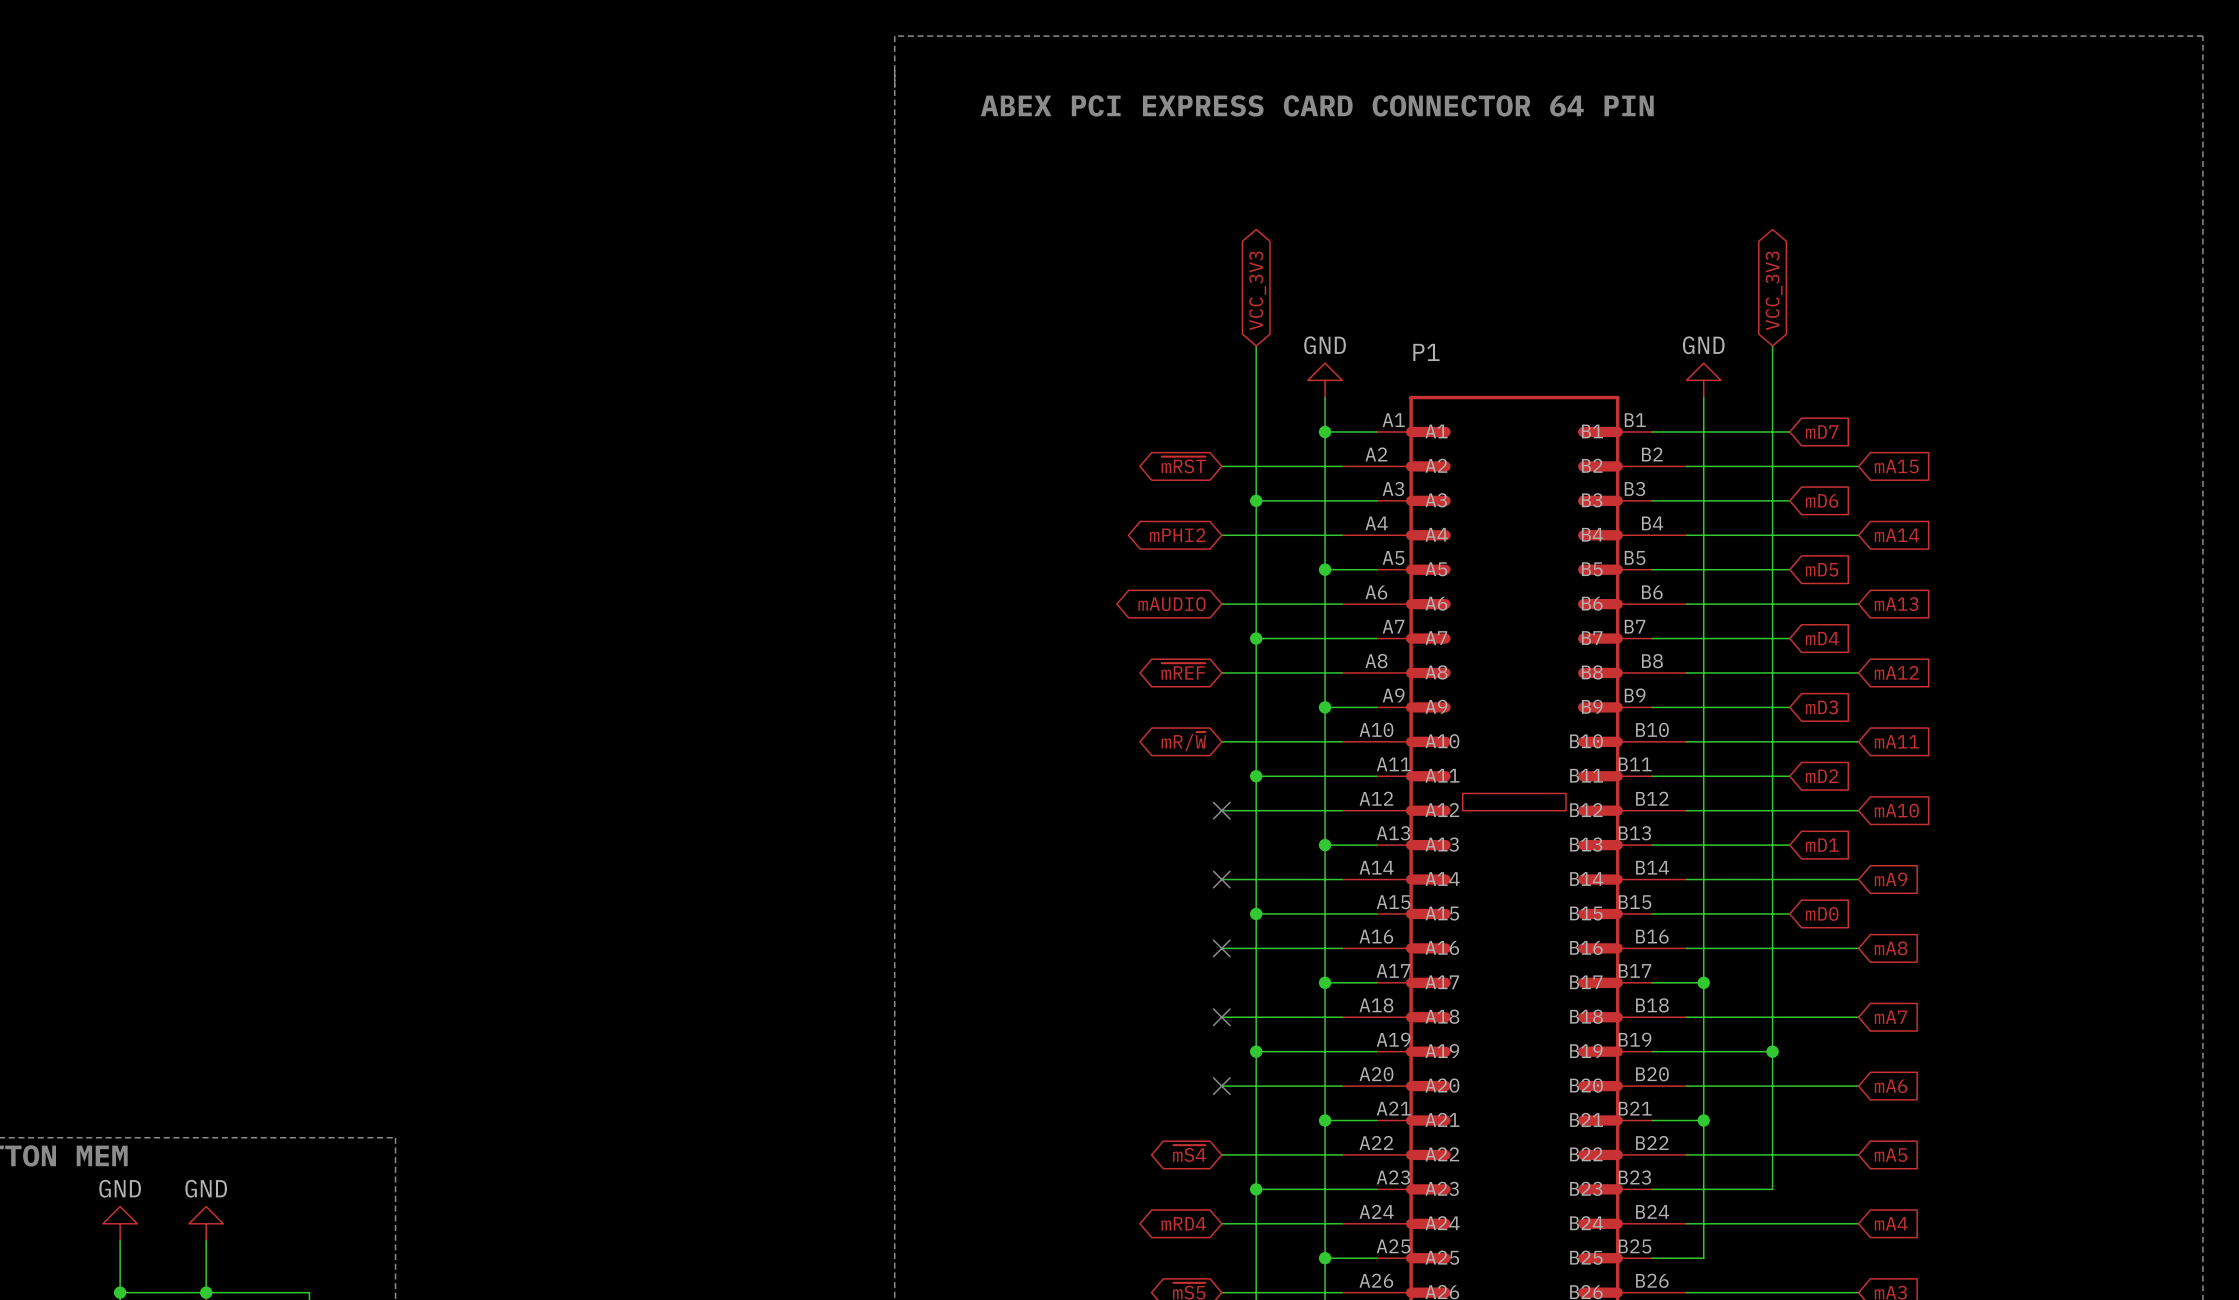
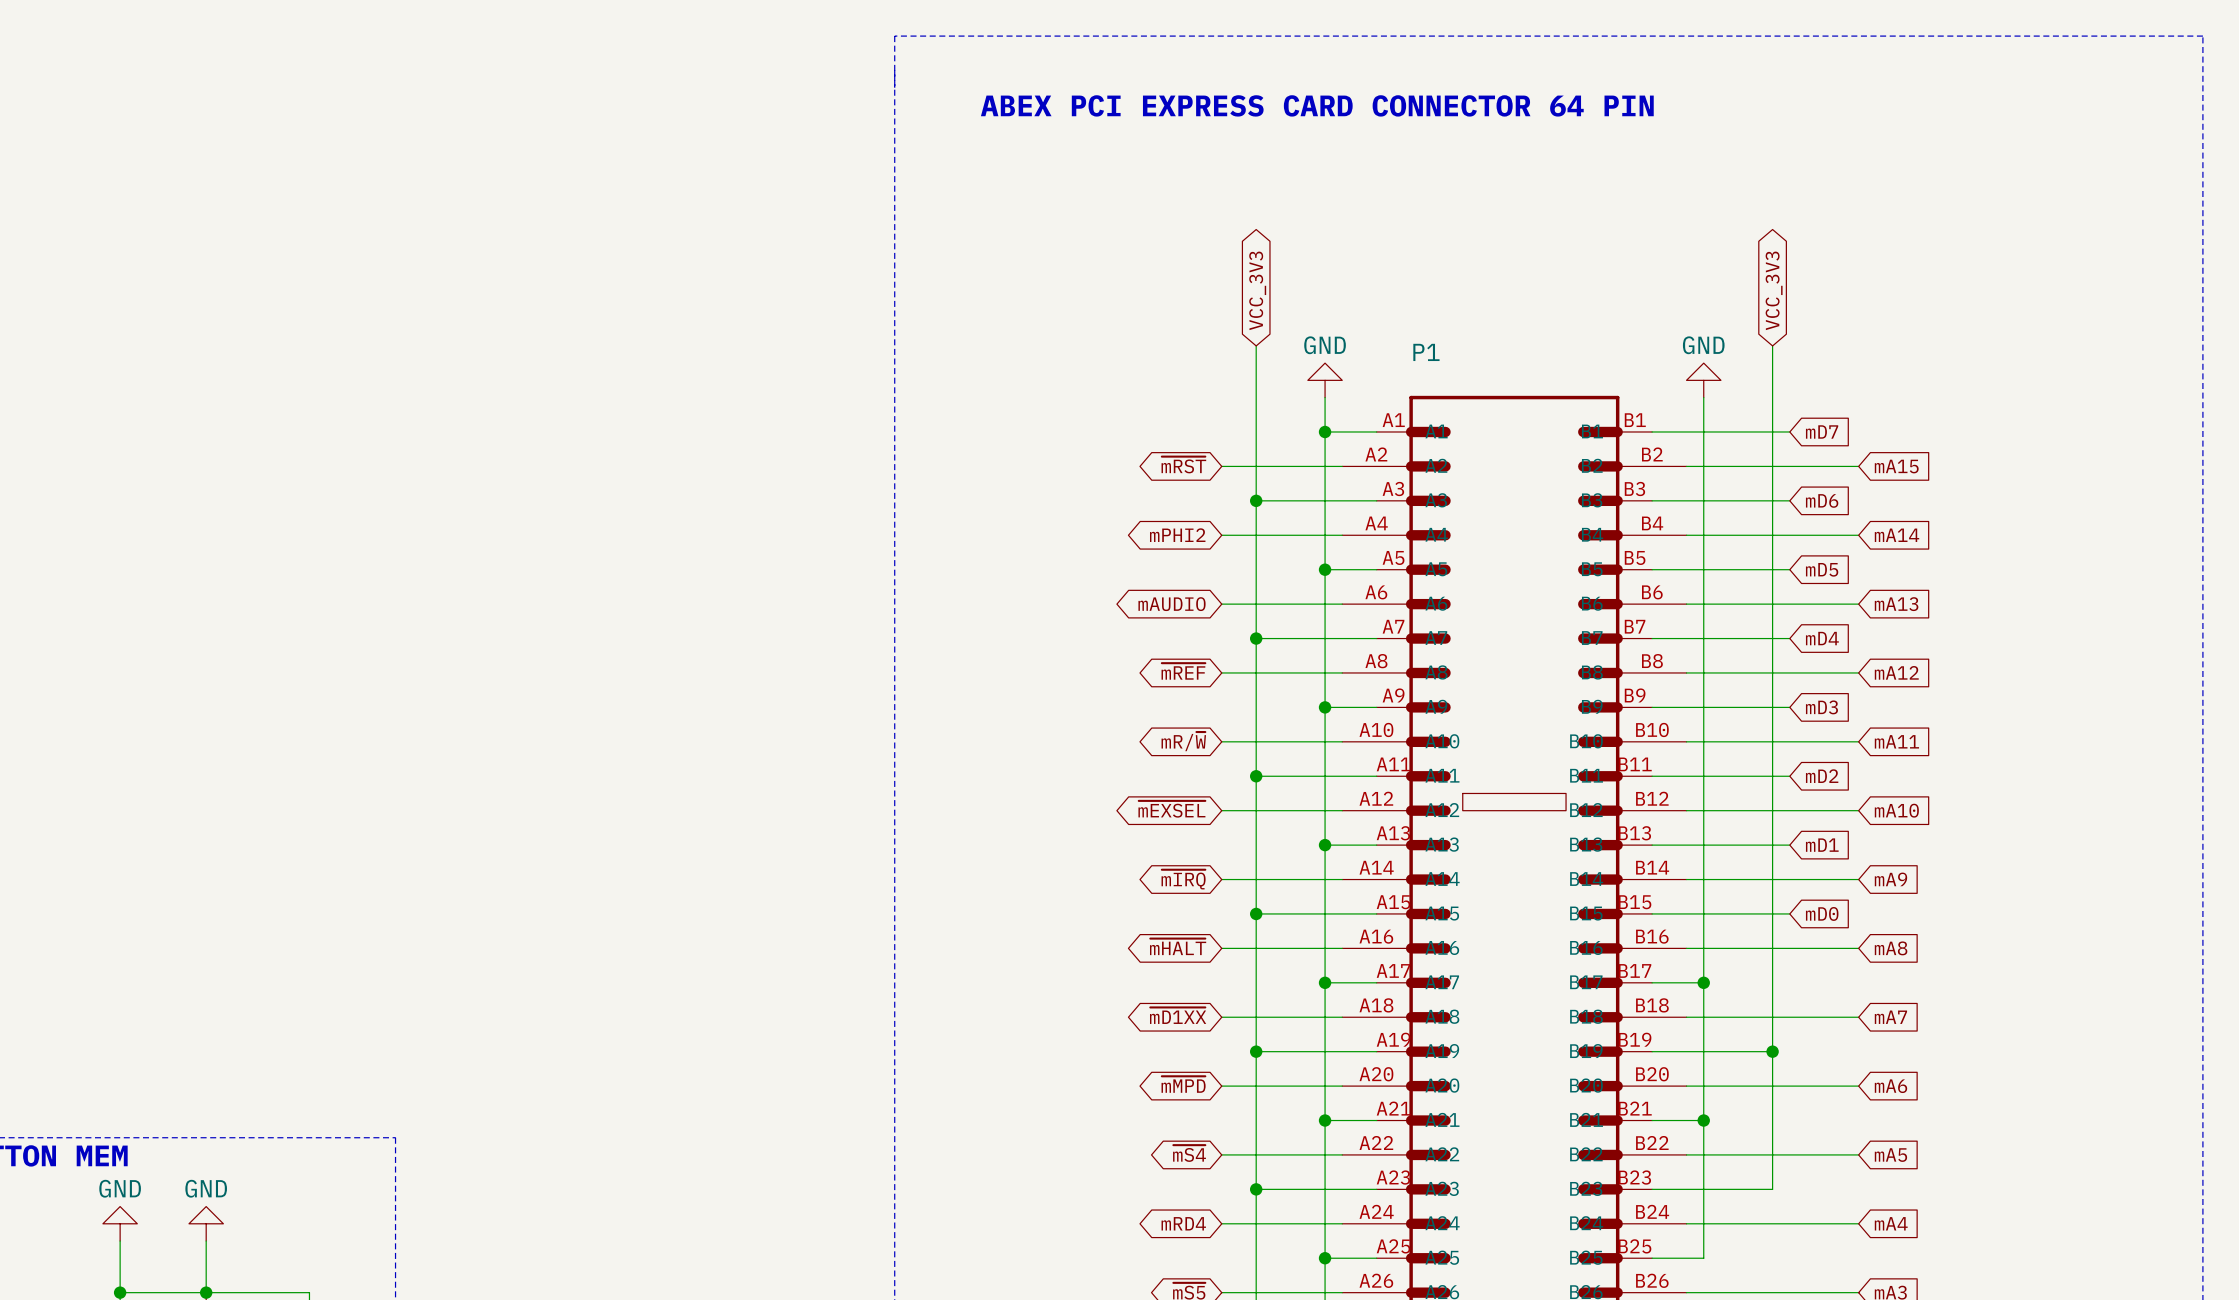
global label: none -> ~{mEXSEL} (1171, 809)
no-connect mark: (1221, 810) -> none
global label: none -> ~{mIRQ} (1183, 879)
no-connect mark: (1221, 879) -> none
global label: none -> ~{mHALT} (1178, 946)
no-connect mark: (1221, 948) -> none
global label: none -> ~{mD1XX} (1178, 1015)
no-connect mark: (1221, 1017) -> none
global label: none -> ~{mMPD} (1183, 1084)
no-connect mark: (1221, 1086) -> none

